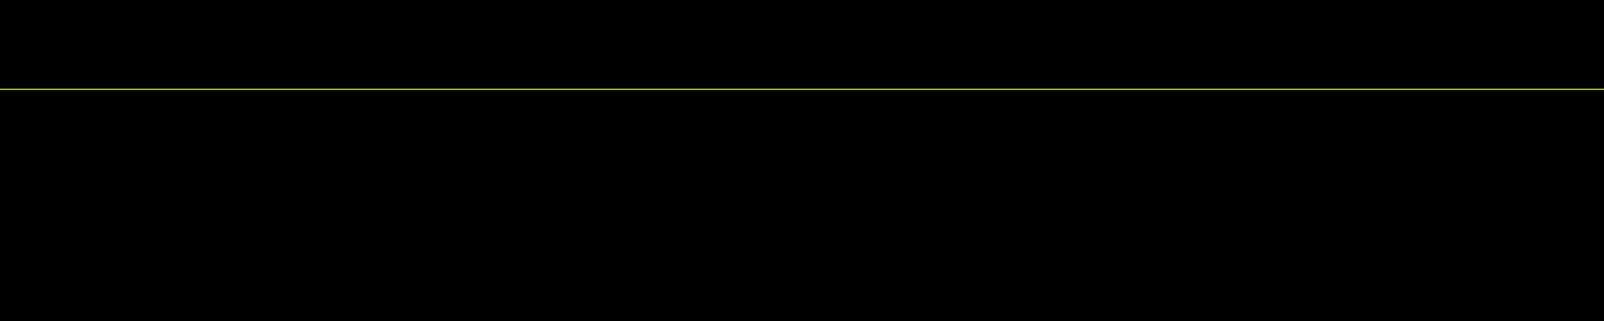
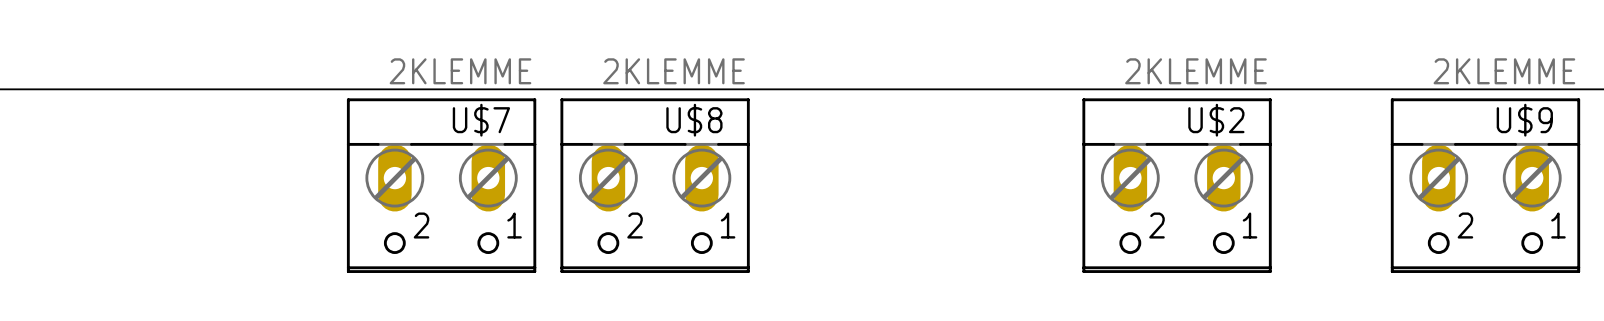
U$7: none -> 2KLEMME (441, 185)
U$8: none -> 2KLEMME (655, 185)
U$2: none -> 2KLEMME (1177, 185)
U$9: none -> 2KLEMME (1485, 185)

